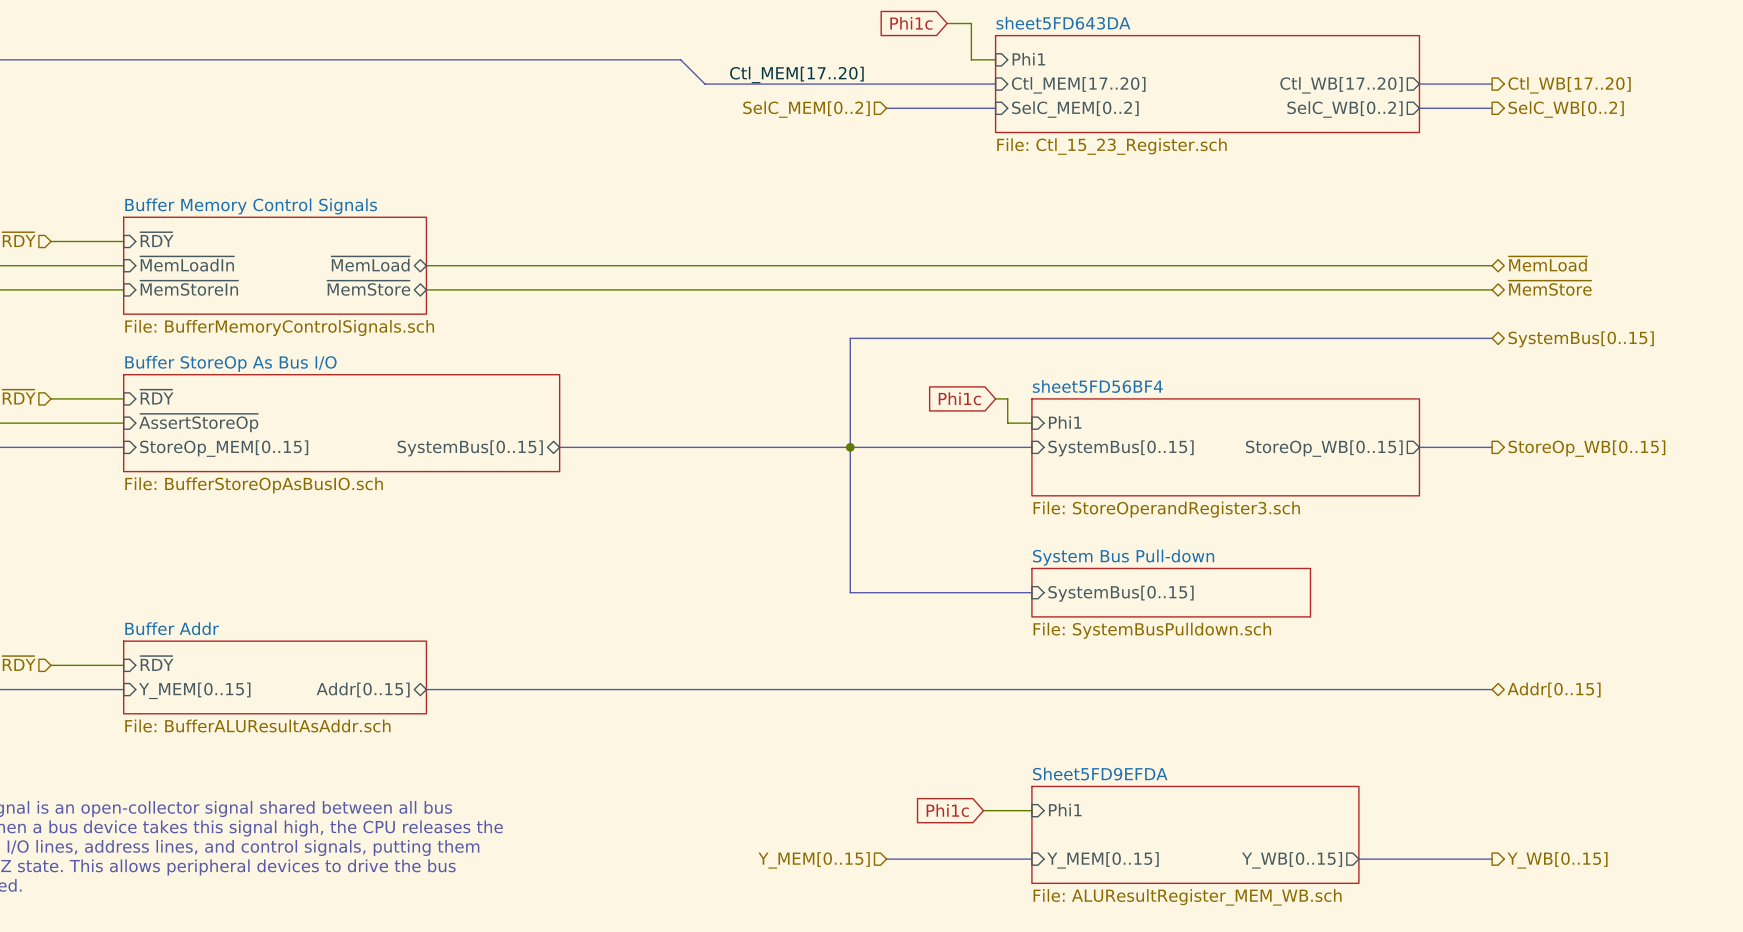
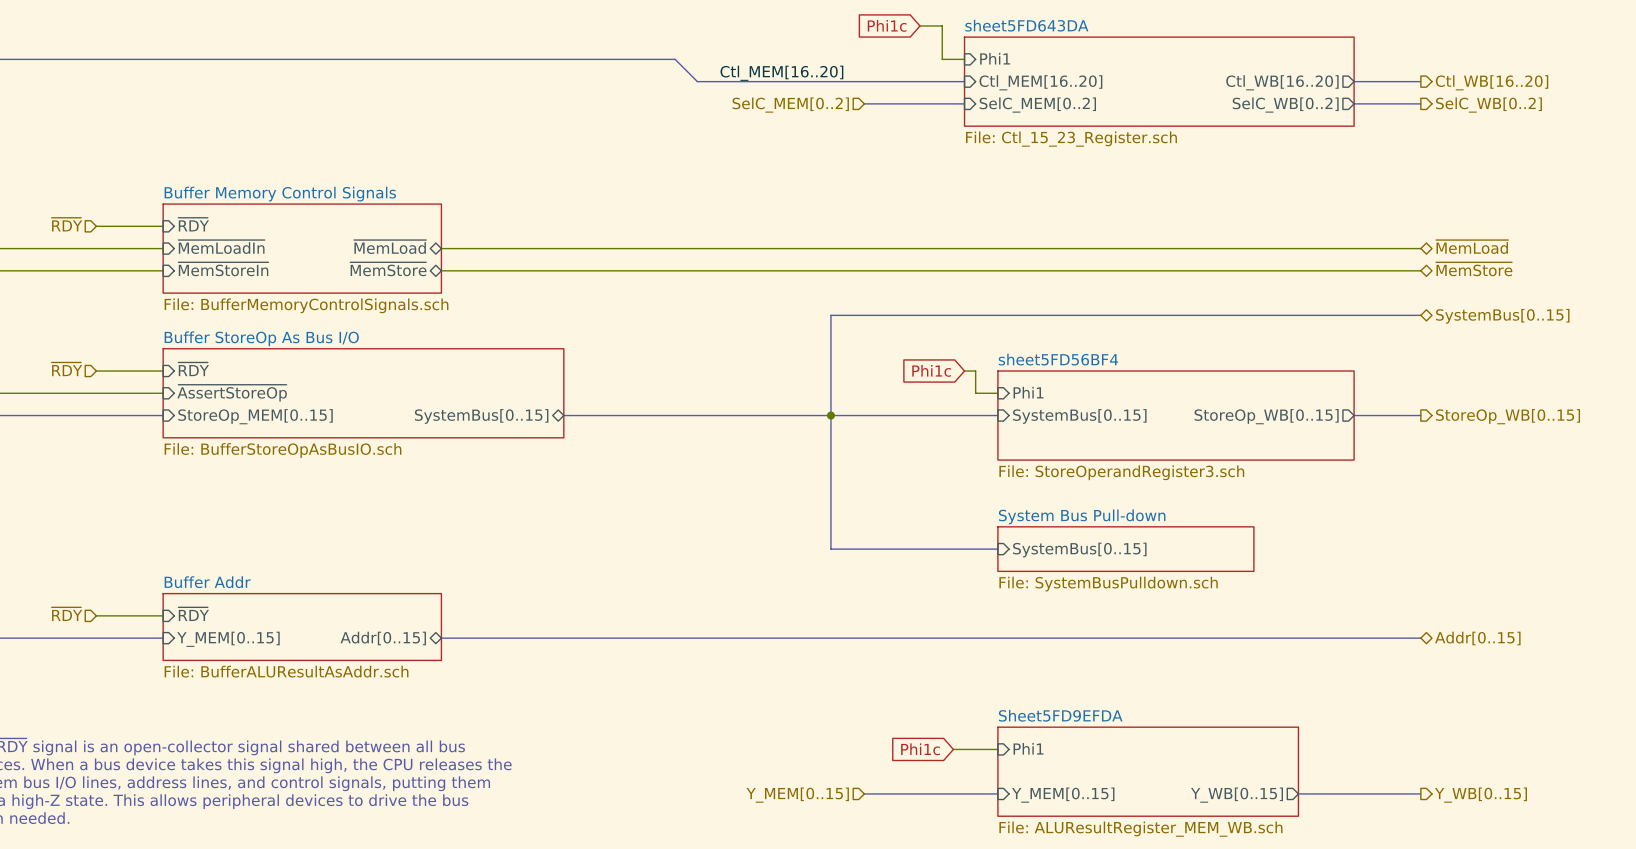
label: Ctl_MEM[17..20] (796, 74) -> Ctl_MEM[16..20] (781, 73)
sheet pin: Ctl_MEM[17..20] (1078, 85) -> Ctl_MEM[16..20] (1040, 82)
sheet pin: Ctl_WB[17..20] (1341, 85) -> Ctl_WB[16..20] (1282, 82)
hierarchical label: Ctl_WB[17..20] (1569, 85) -> Ctl_WB[16..20] (1492, 82)

